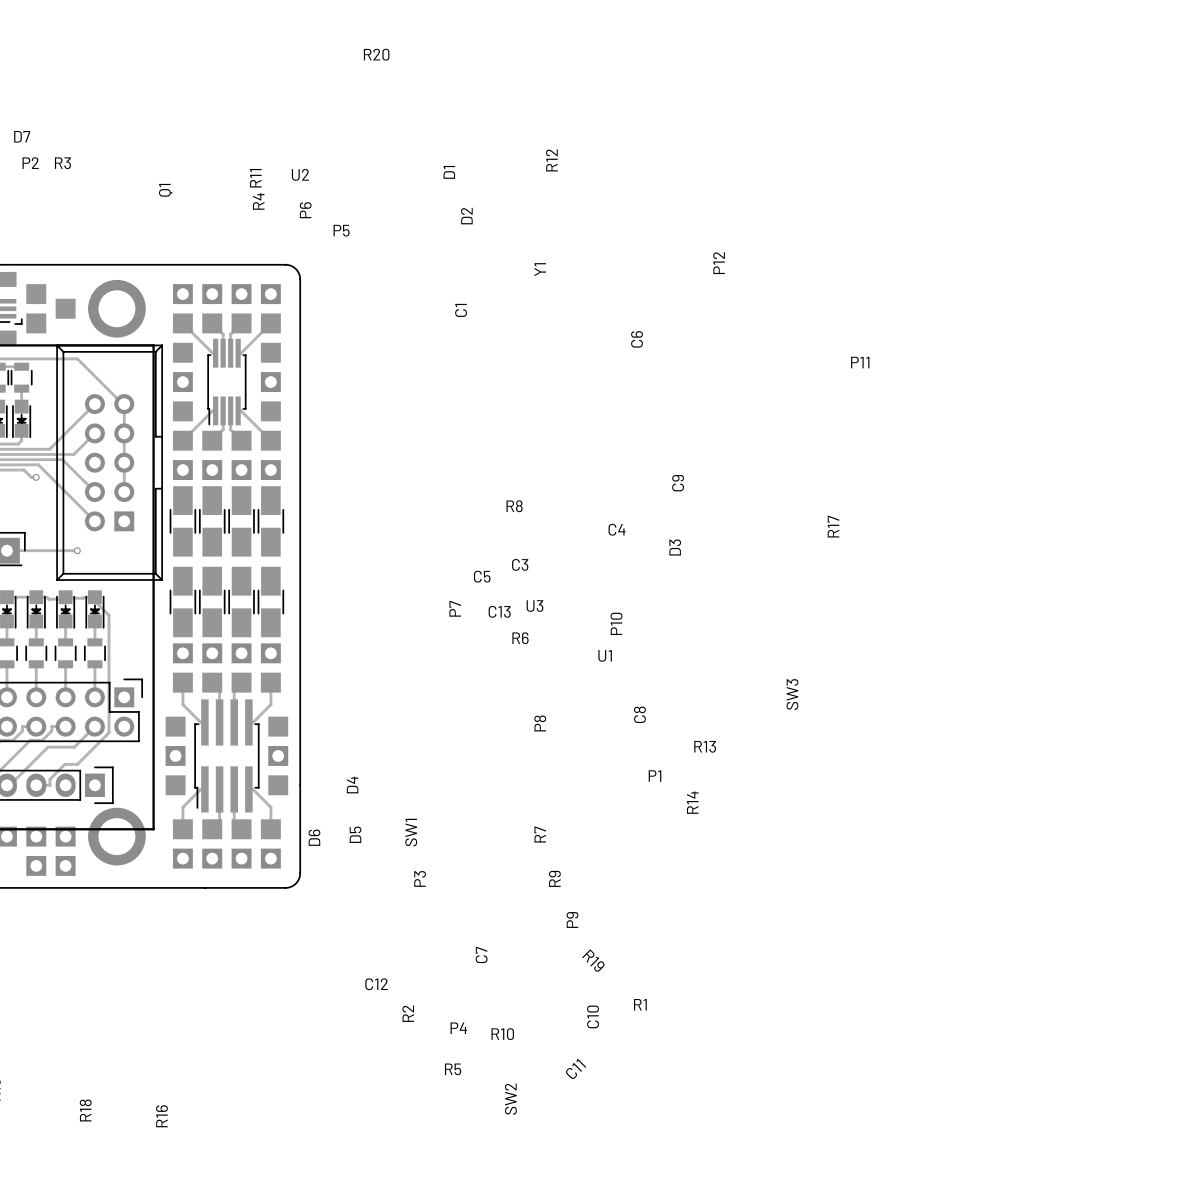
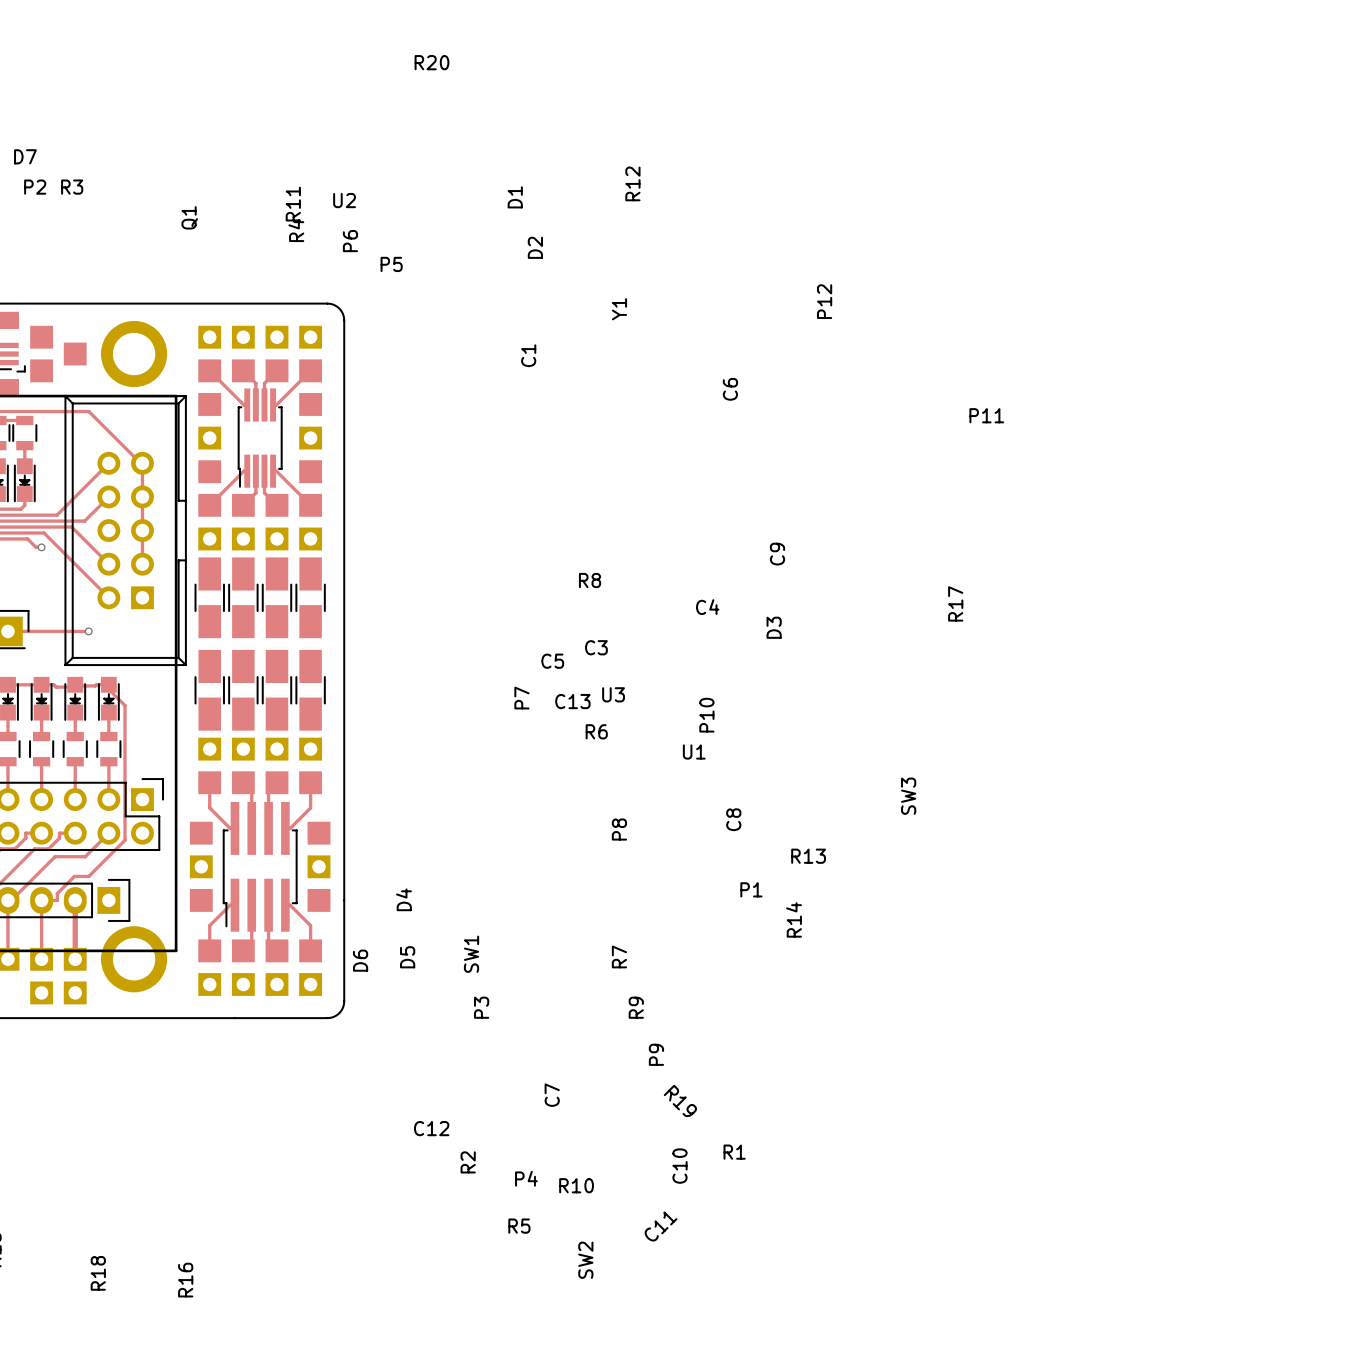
track: none -> (7, 900) (7, 959)
track: none -> (41, 900) (41, 959)
track: none -> (75, 900) (75, 959)

